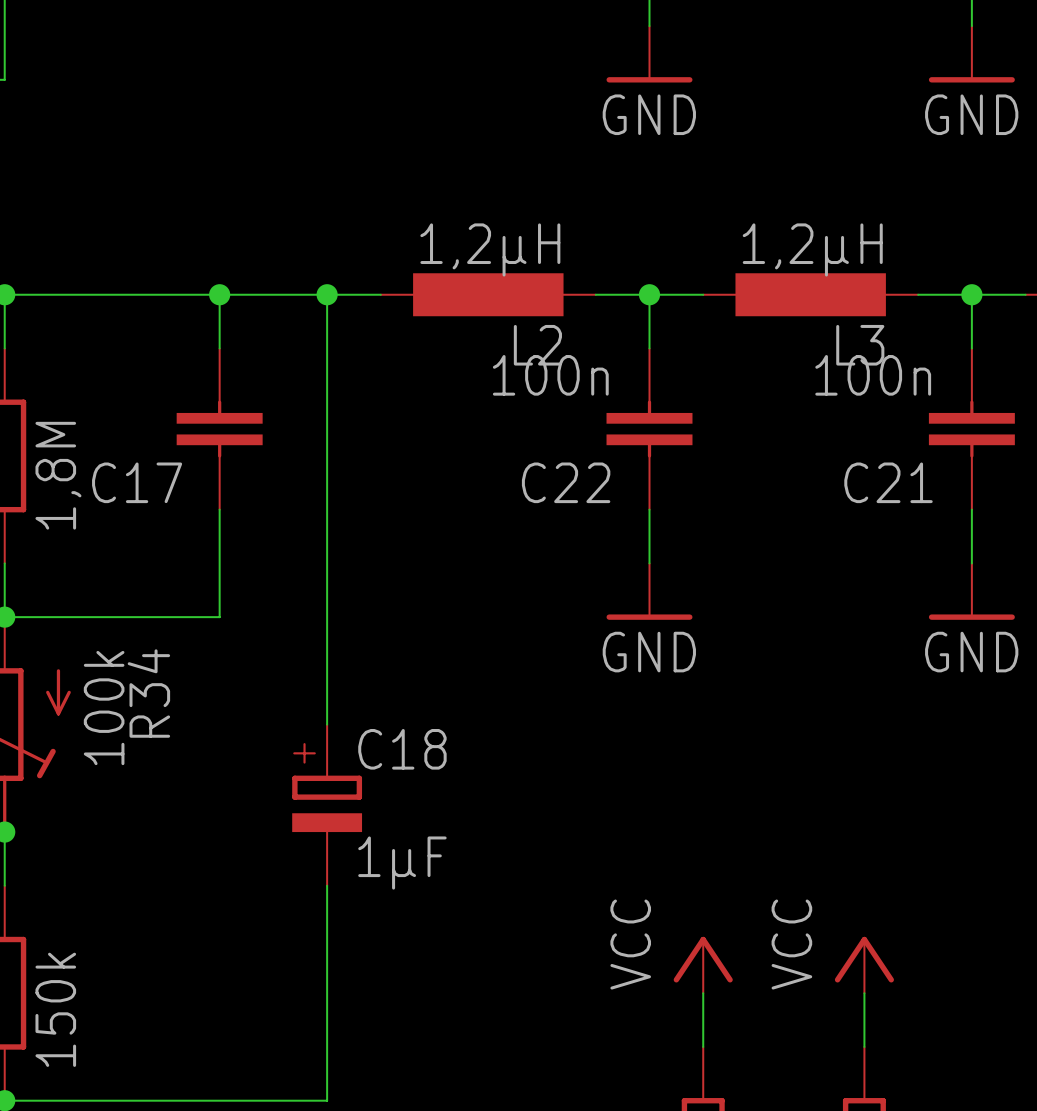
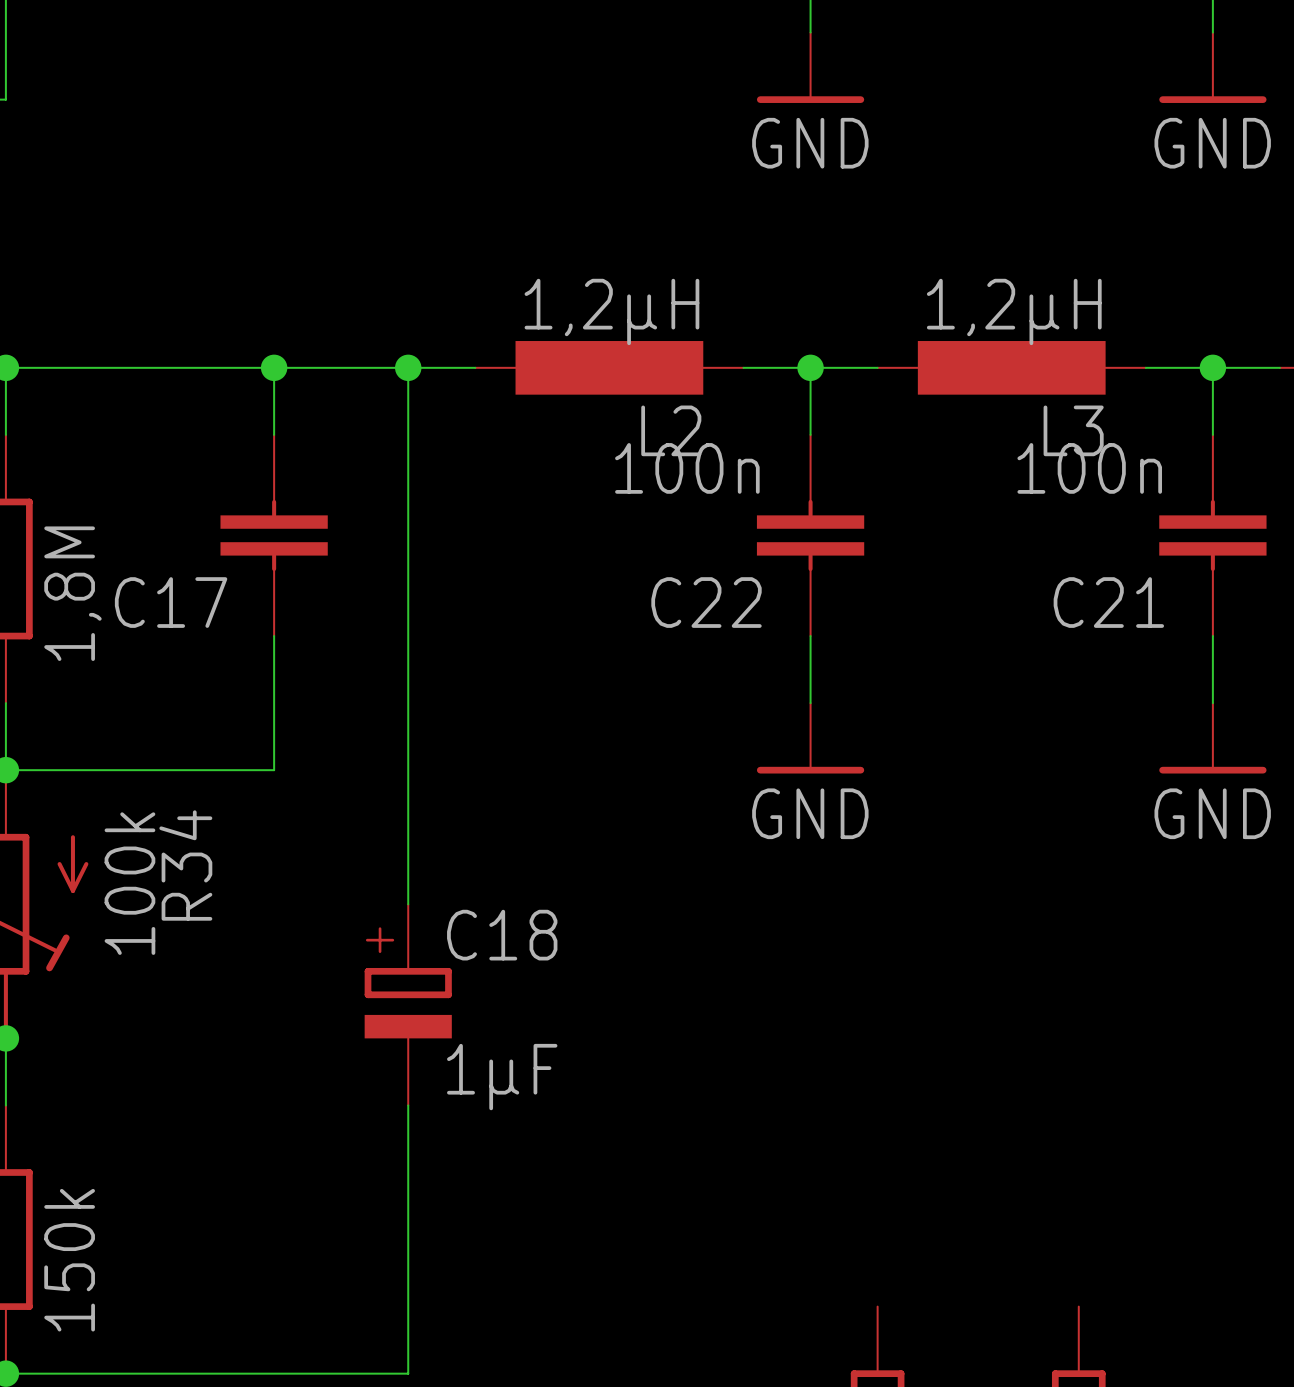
power symbol: VCC (703, 965) -> none
power symbol: VCC (864, 965) -> none
wire: (703, 993) (703, 1046) -> none
wire: (864, 993) (864, 1046) -> none

